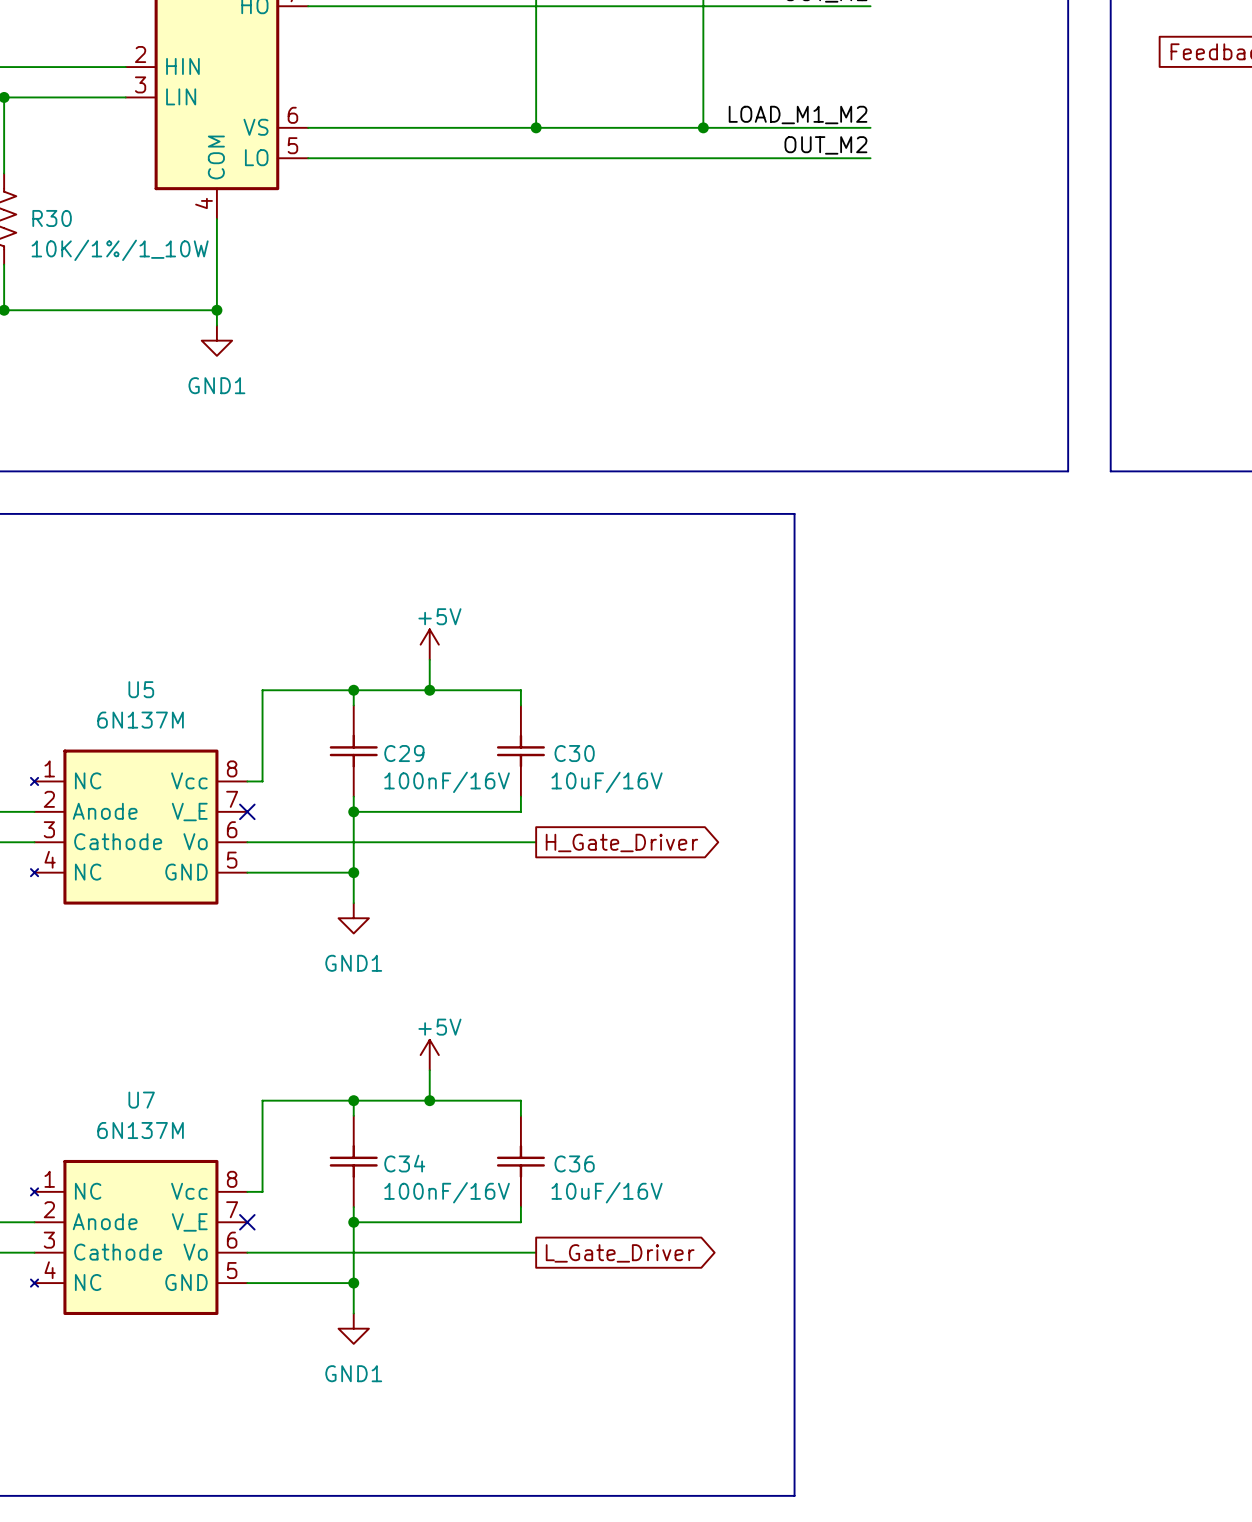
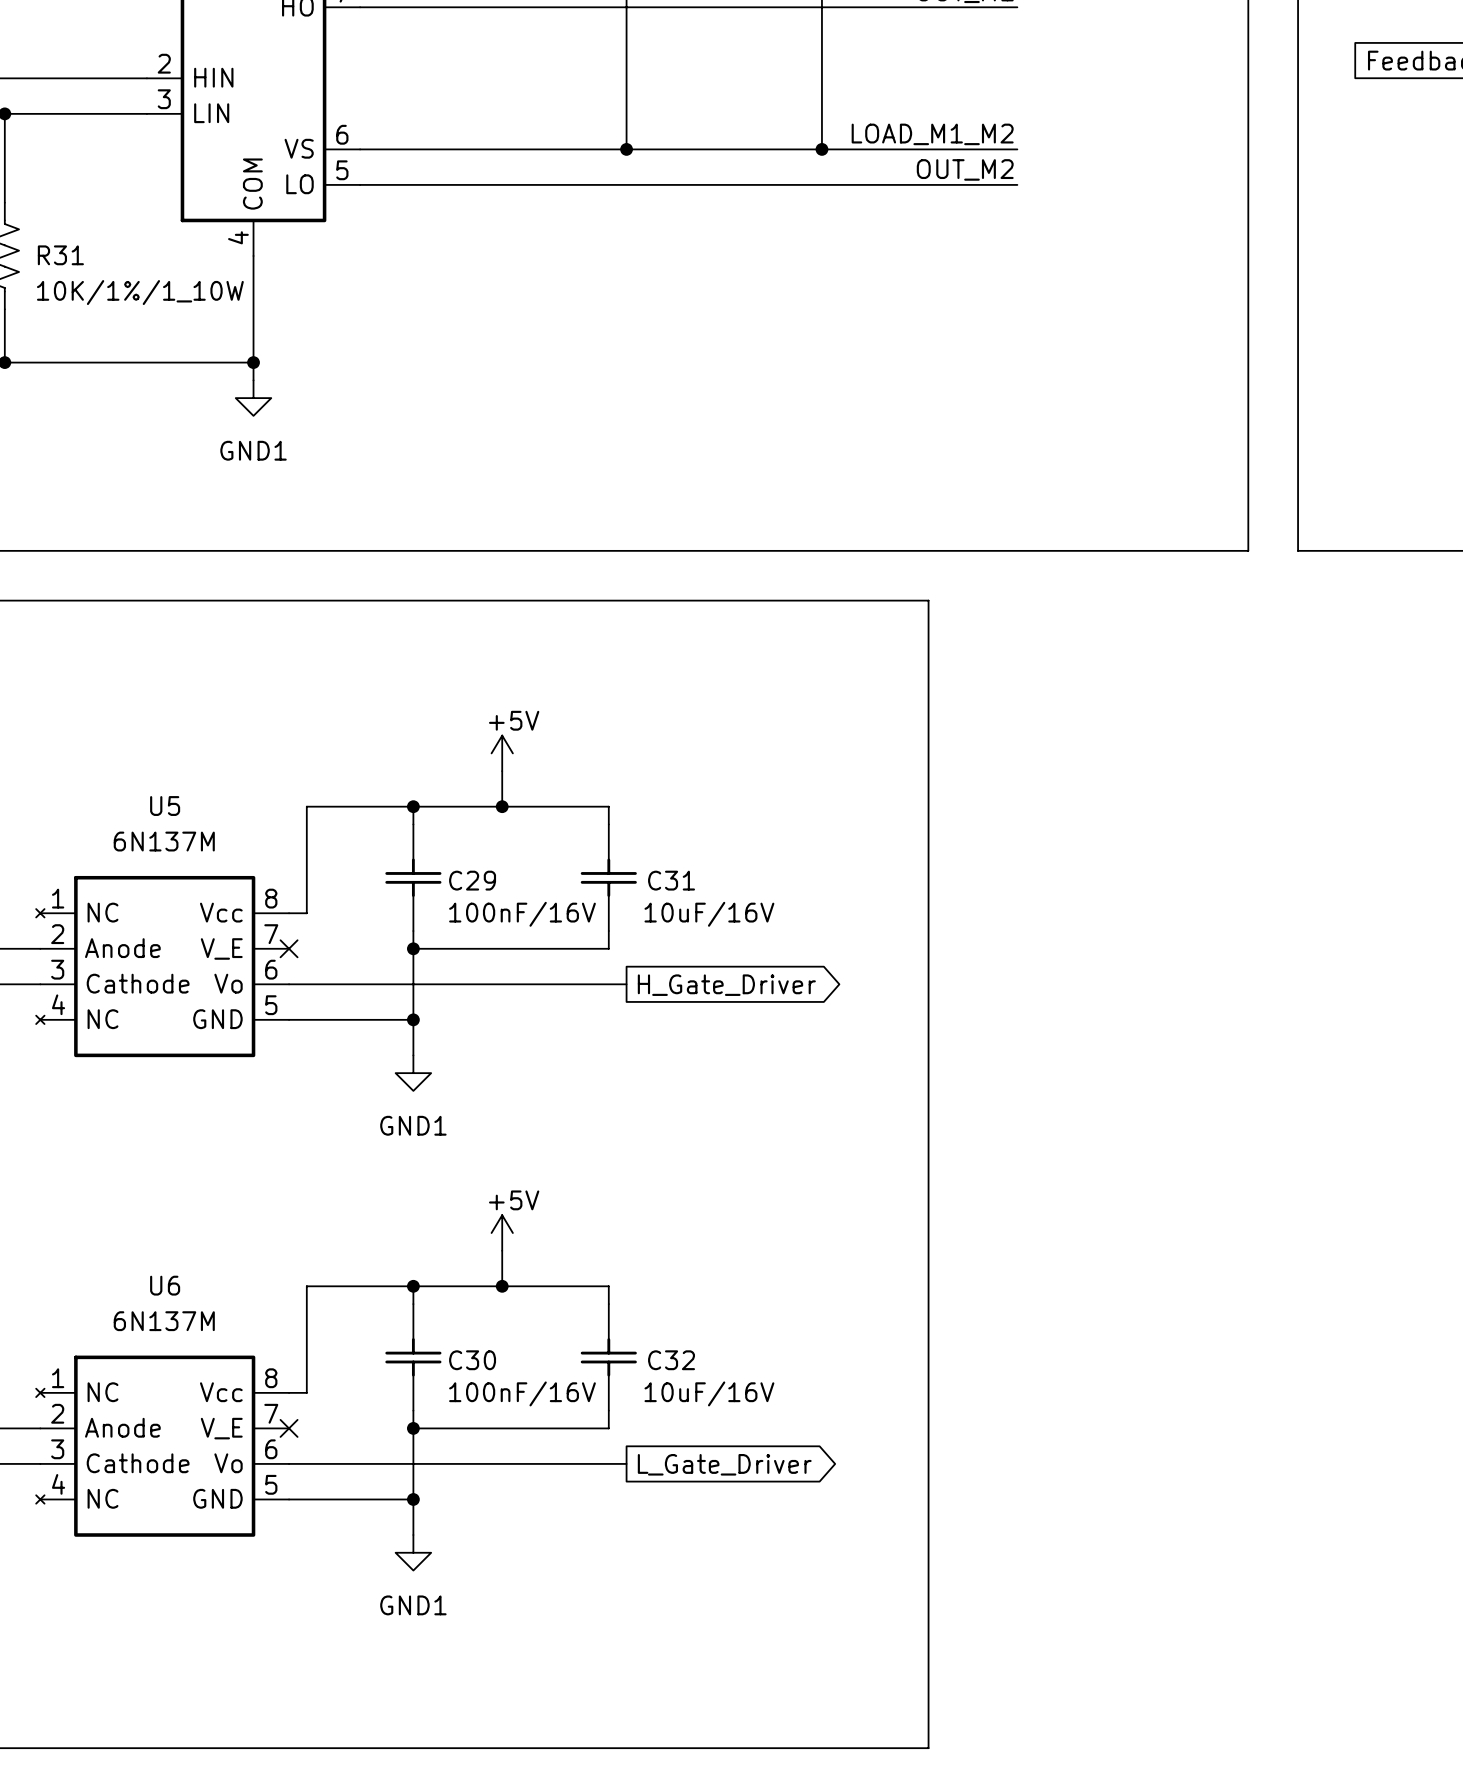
R30 name: R30 (52, 218) -> R31 (60, 255)
C30 name: C30 (574, 753) -> C31 (671, 880)
U7 name: U7 (141, 1100) -> U6 (165, 1285)
C34 name: C34 (404, 1163) -> C30 (472, 1360)
C36 name: C36 (574, 1163) -> C32 (671, 1360)

